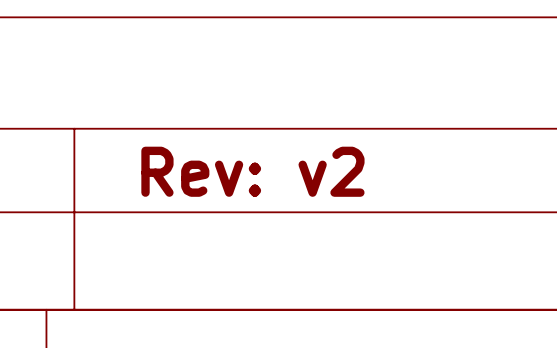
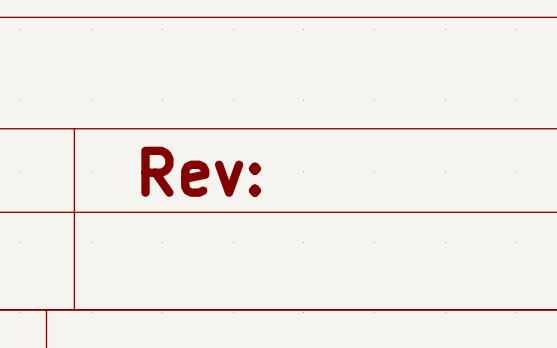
title block: Rev: v2 (252, 171) -> Rev: (201, 171)

